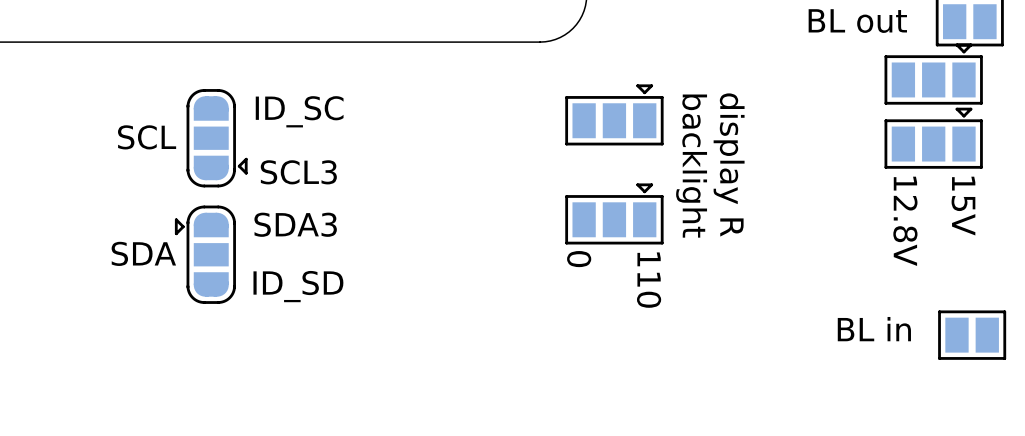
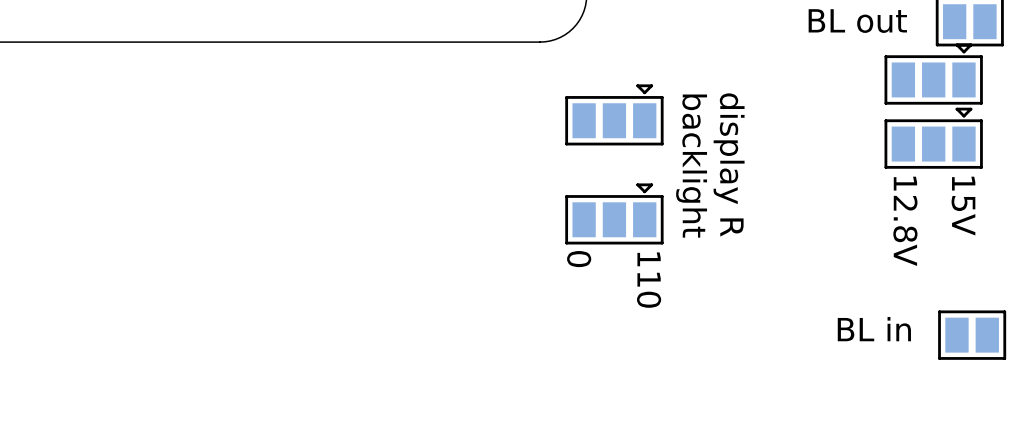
text: ID_SC (299, 111) -> none
text: SCL (147, 137) -> none
part: (217, 138) -> none
text: SCL3 (298, 172) -> none
text: SDA3 (295, 224) -> none
text: SDA (143, 253) -> none
part: (205, 254) -> none
text: ID_SD (298, 286) -> none

